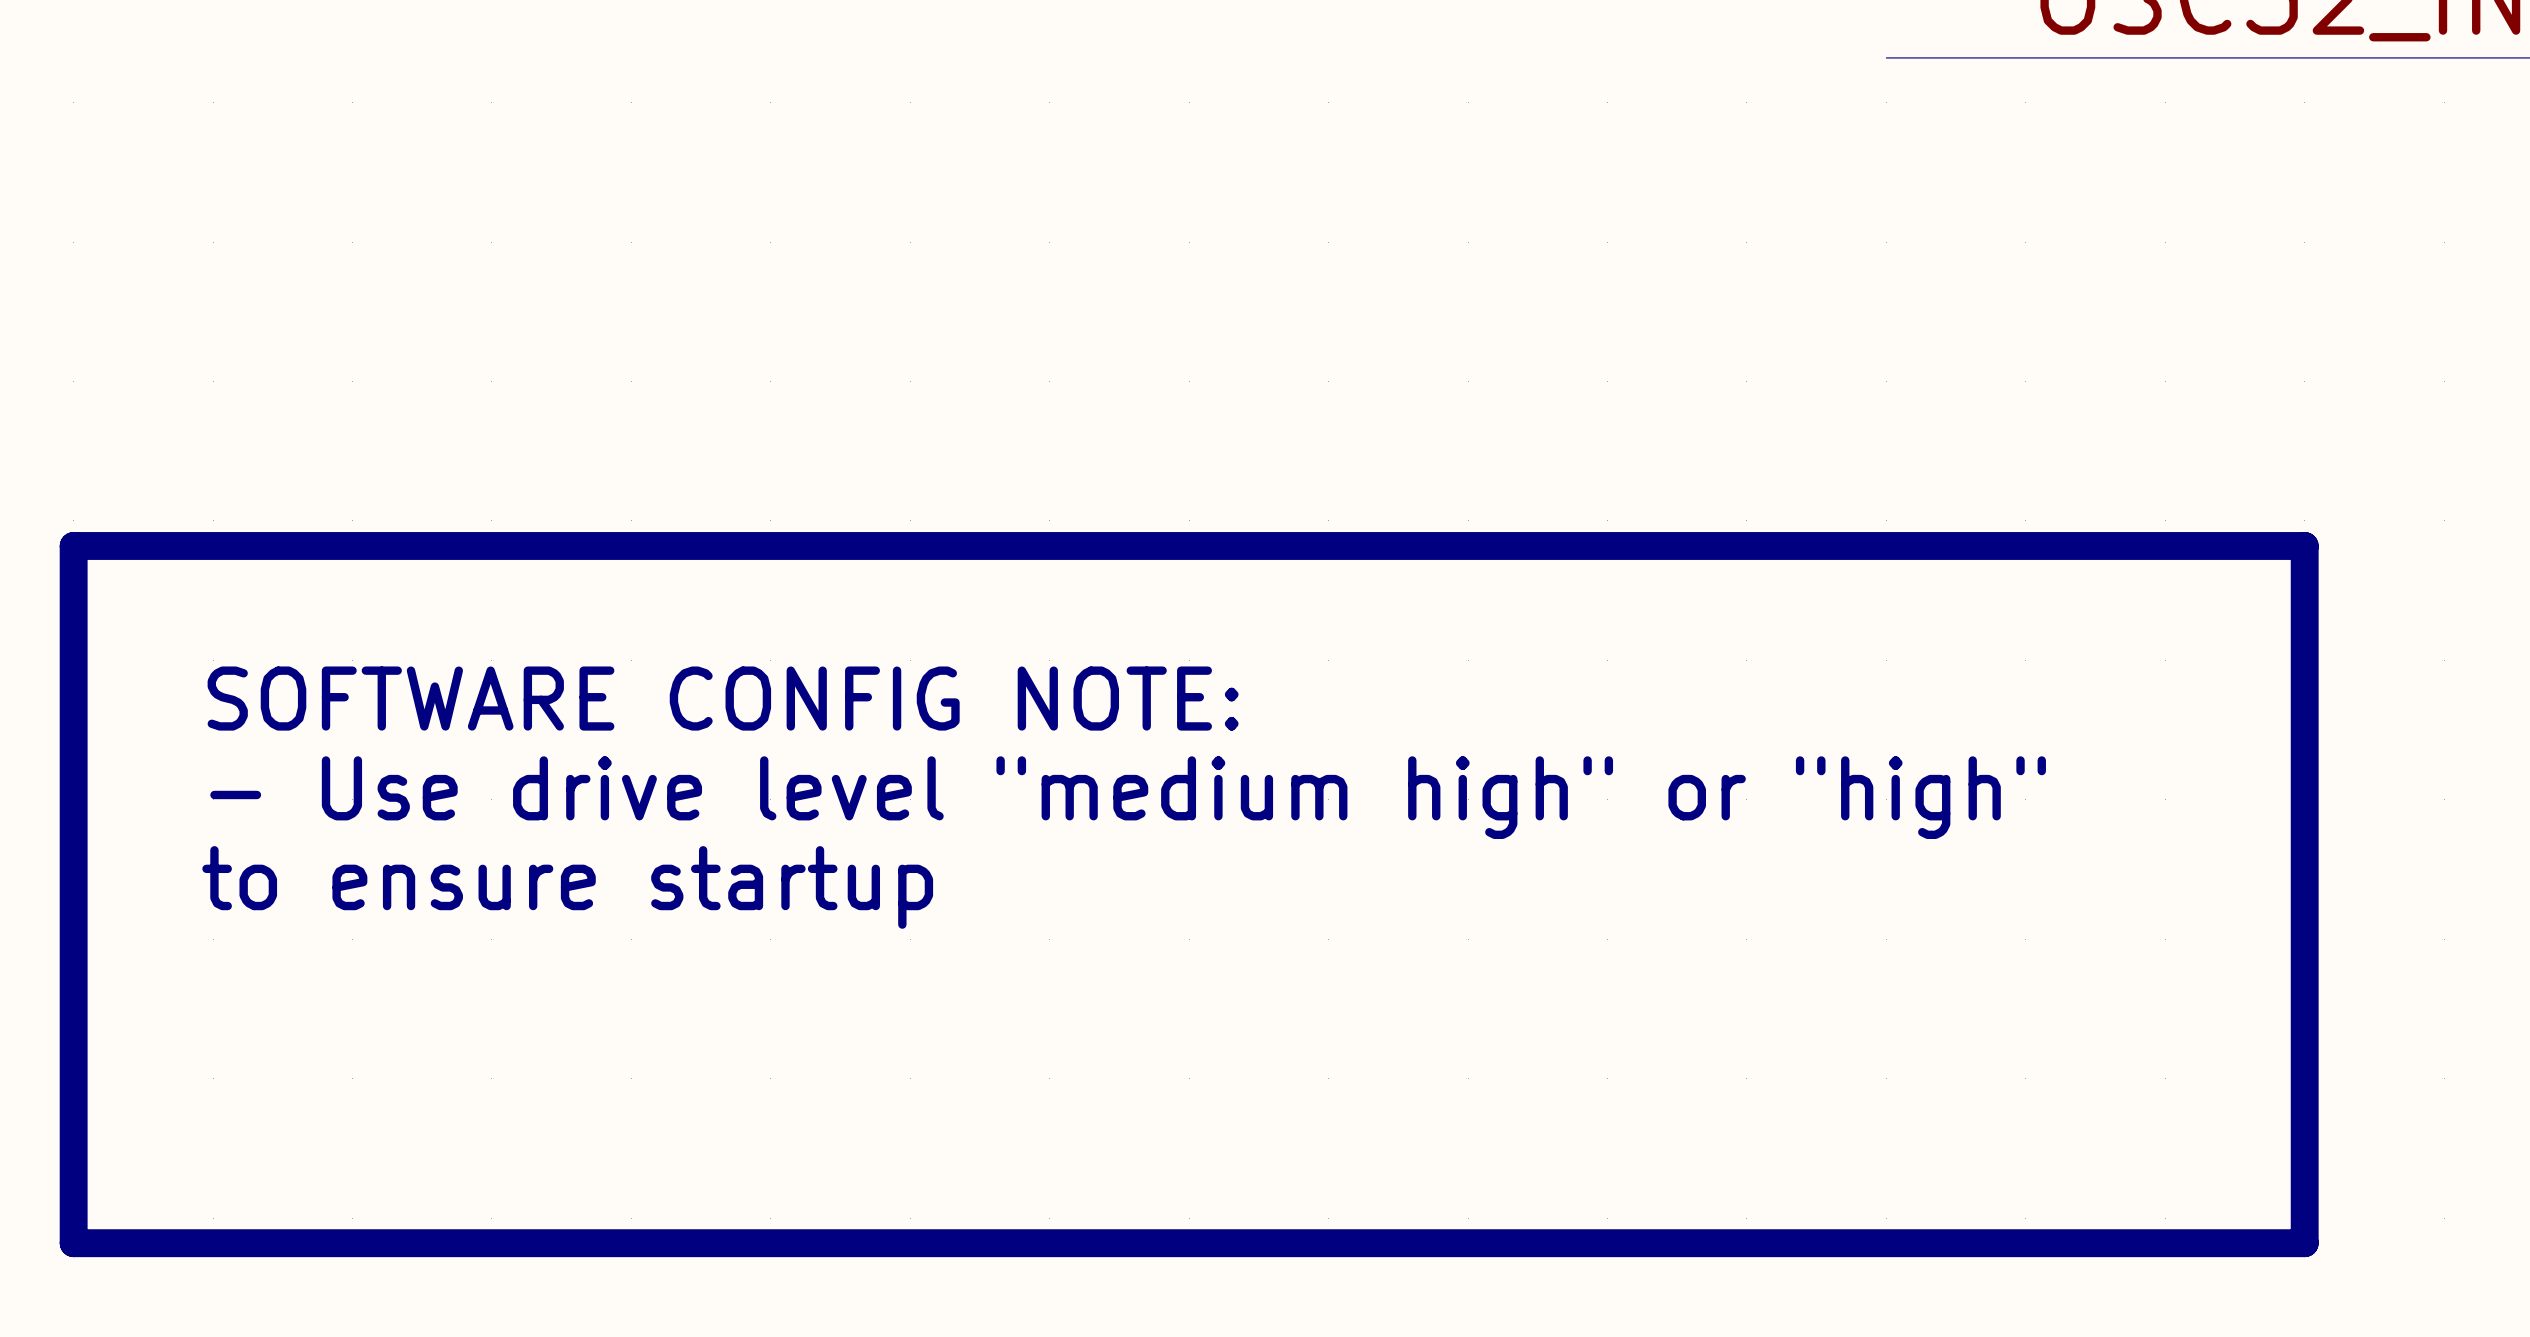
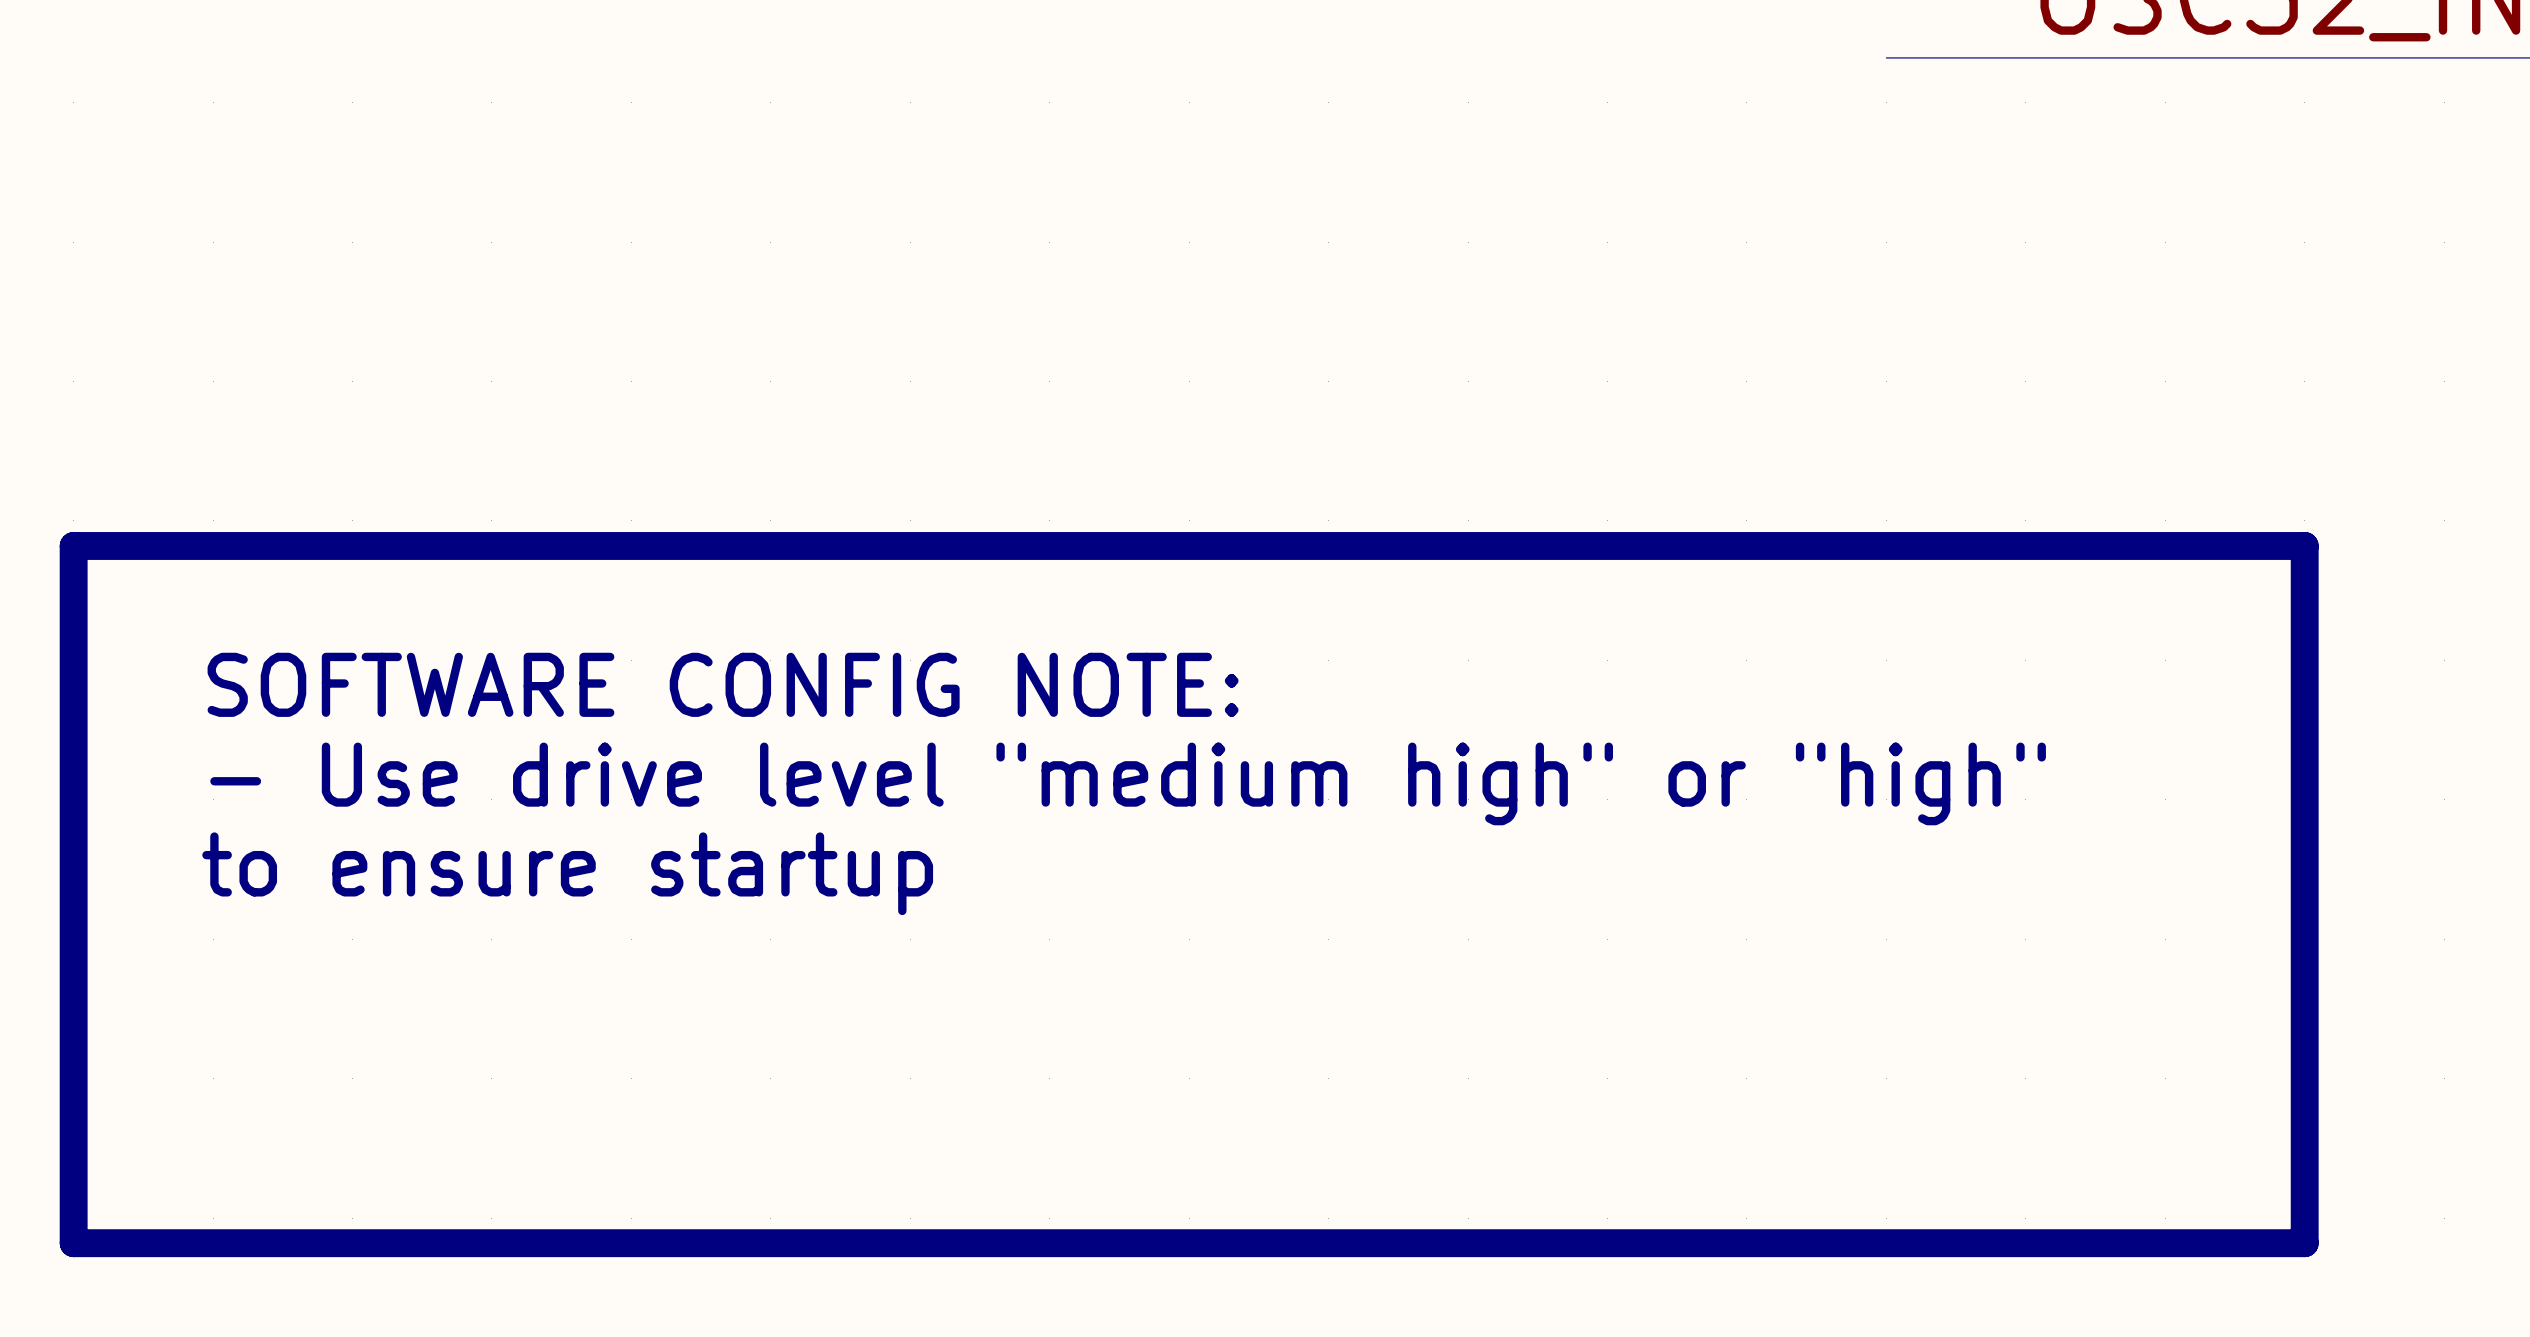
text position: SOFTWARE CONFIG NOTE: (723, 698) -> SOFTWARE CONFIG NOTE: (723, 684)
text position: - Use drive level "medium high" or "high" (1128, 797) -> - Use drive level "medium high" or "high" (1128, 783)
text position: to ensure startup (567, 887) -> to ensure startup (567, 873)

